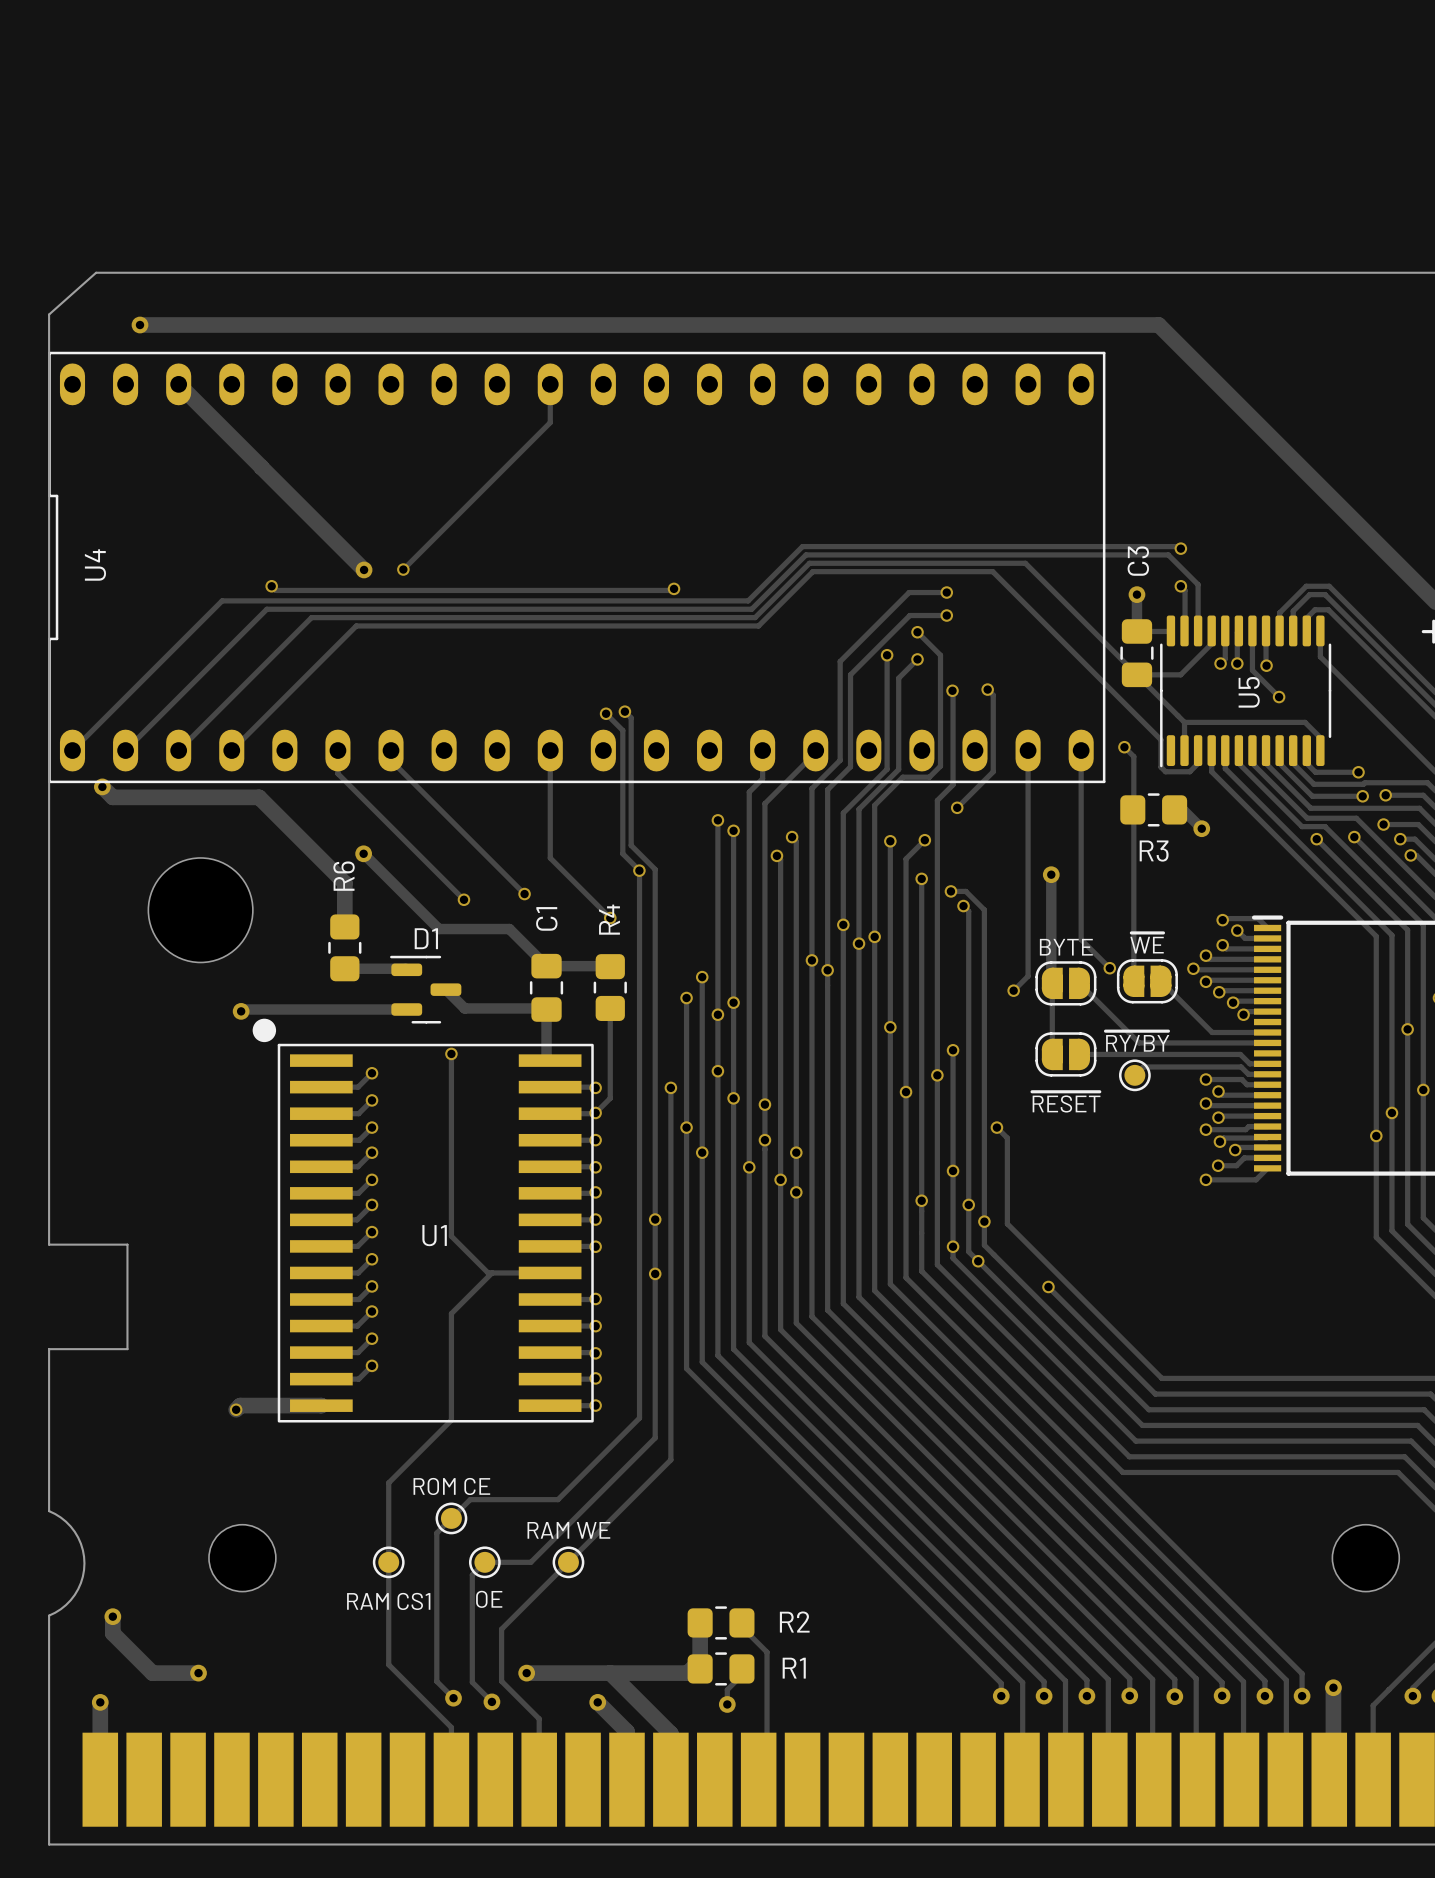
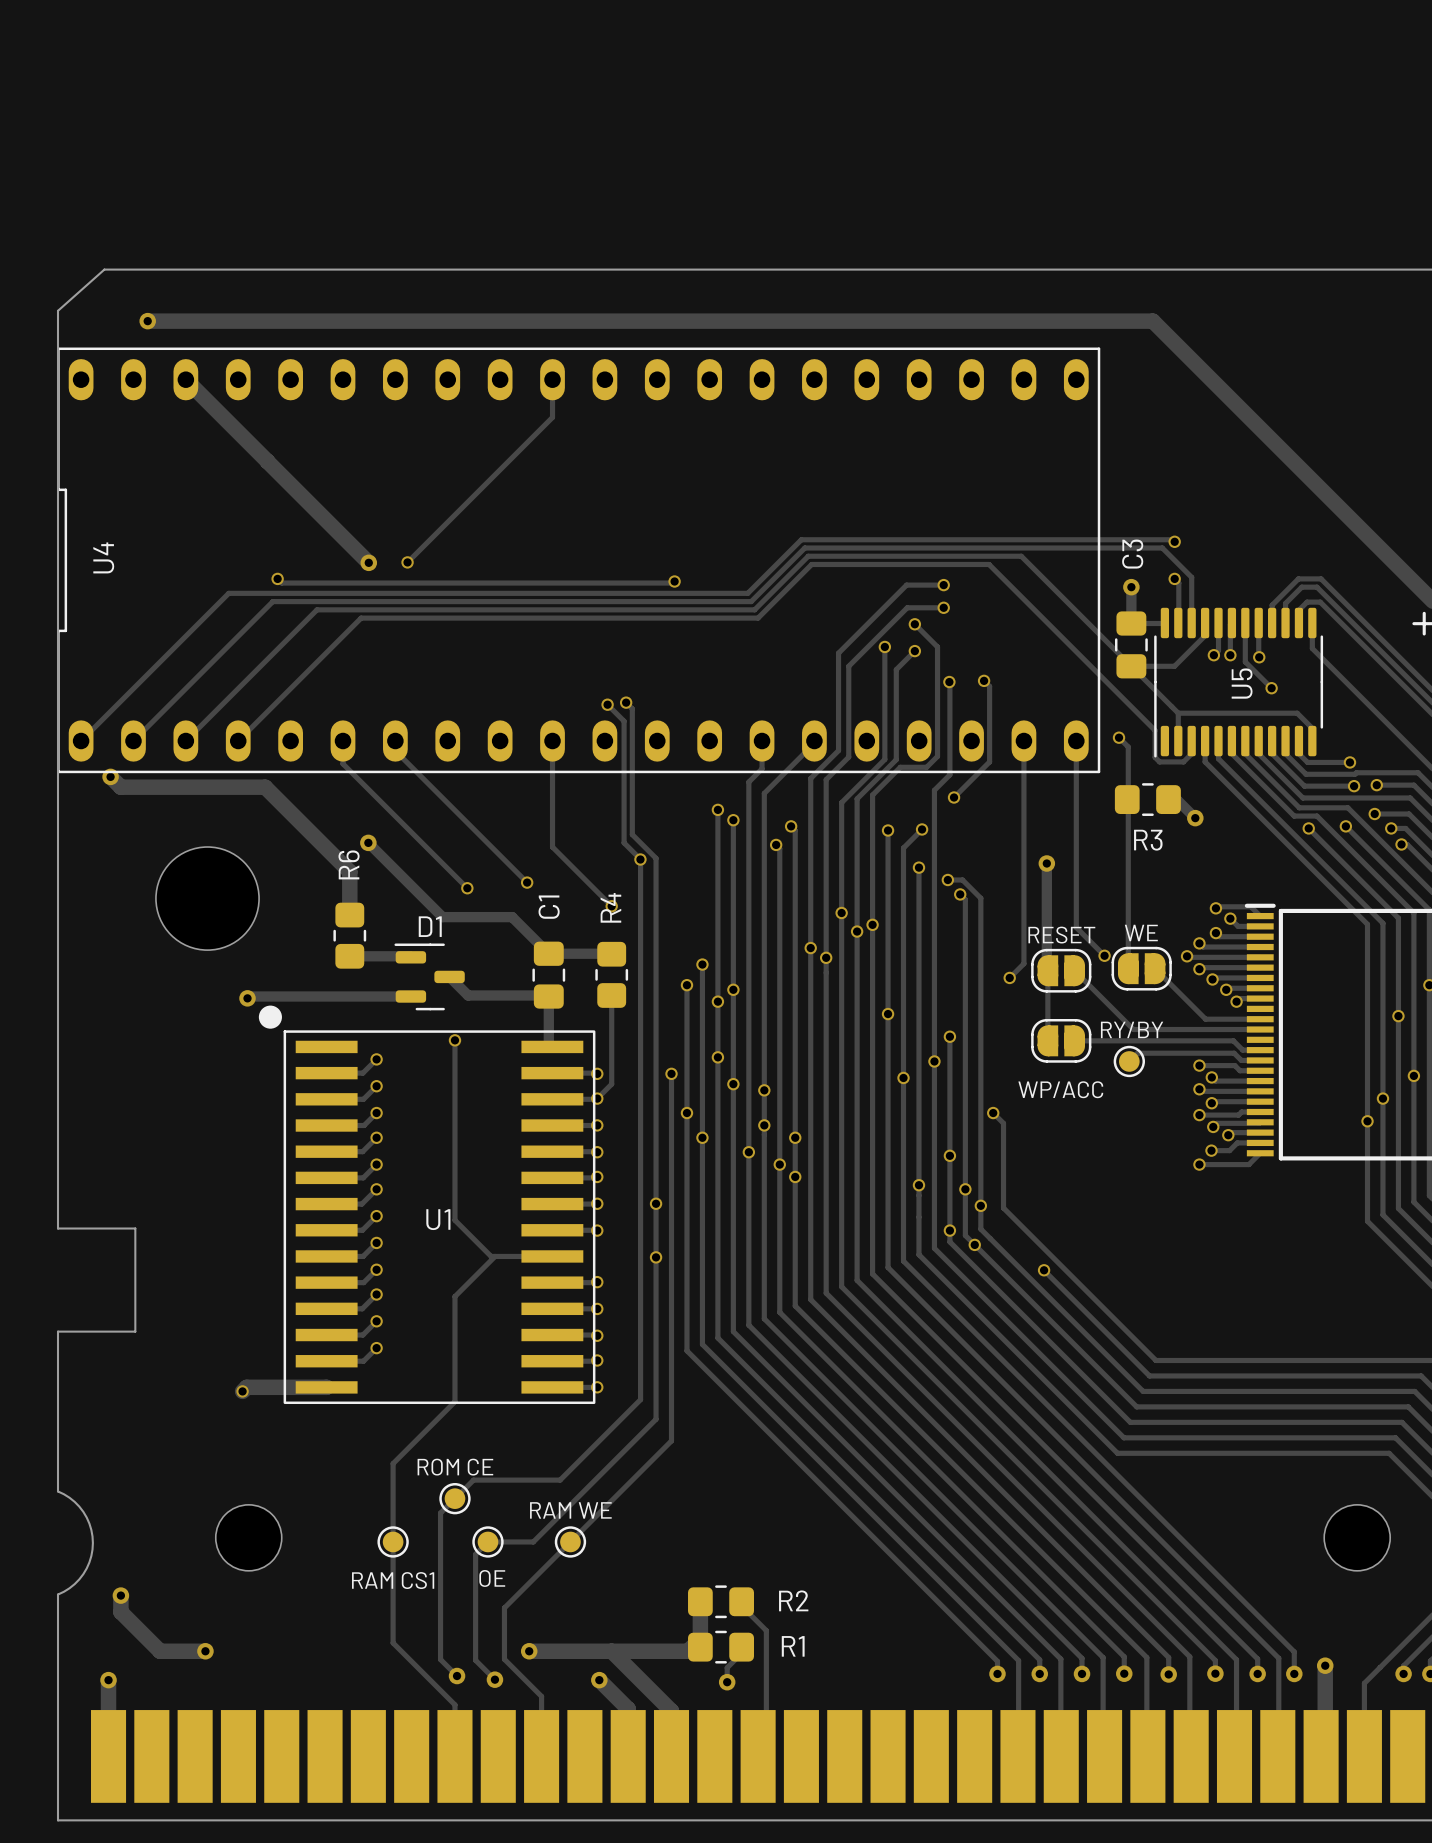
part value: ~{WE} (1147, 943) -> WE (1141, 933)
part value: BYTE (1066, 947) -> RESET (1061, 935)
part value: ~{RY/BY} (1137, 1041) -> RY/BY (1132, 1029)
part value: ~{RESET} (1066, 1102) -> WP/ACC (1060, 1089)

